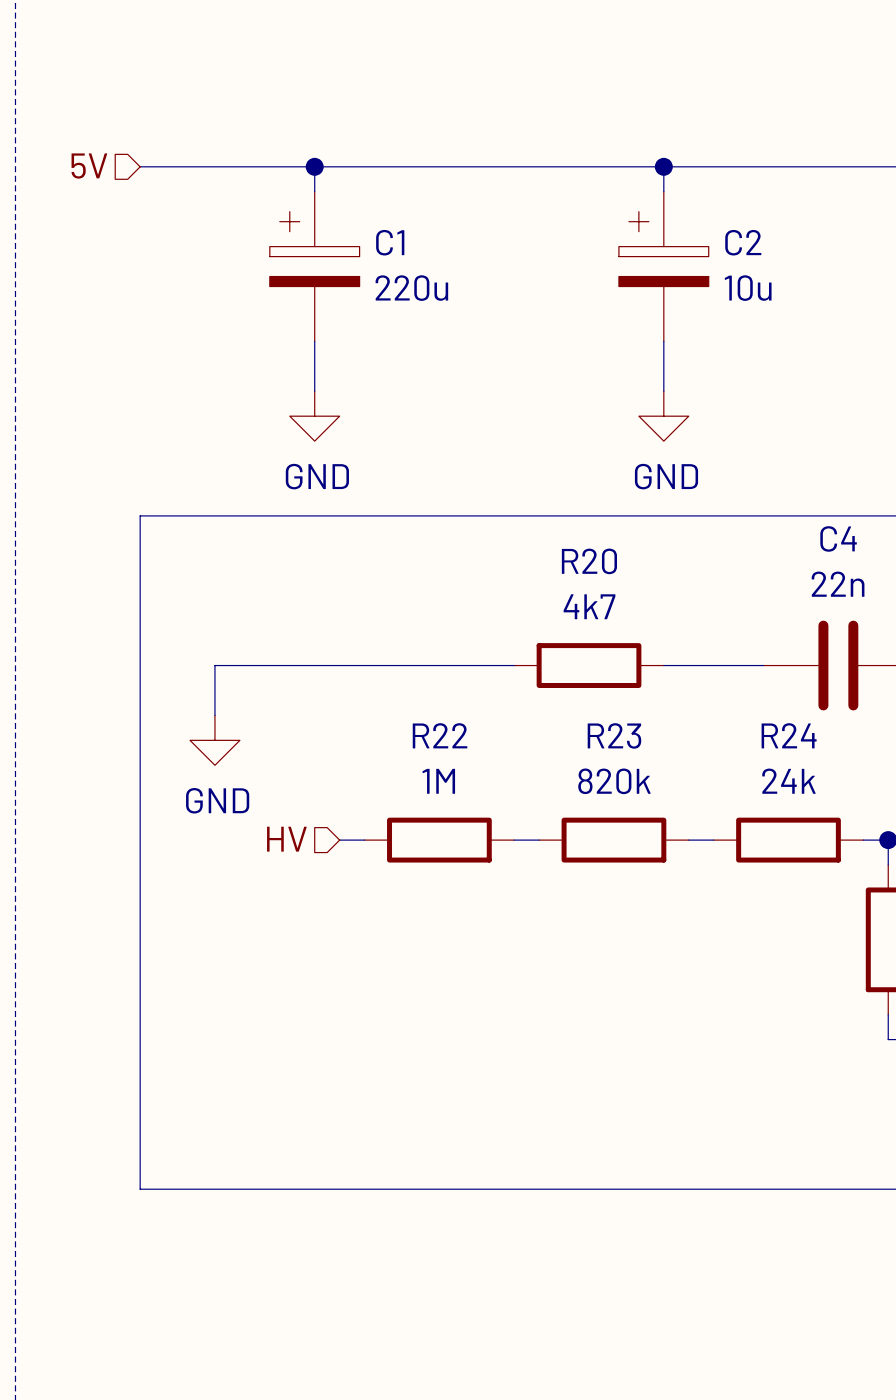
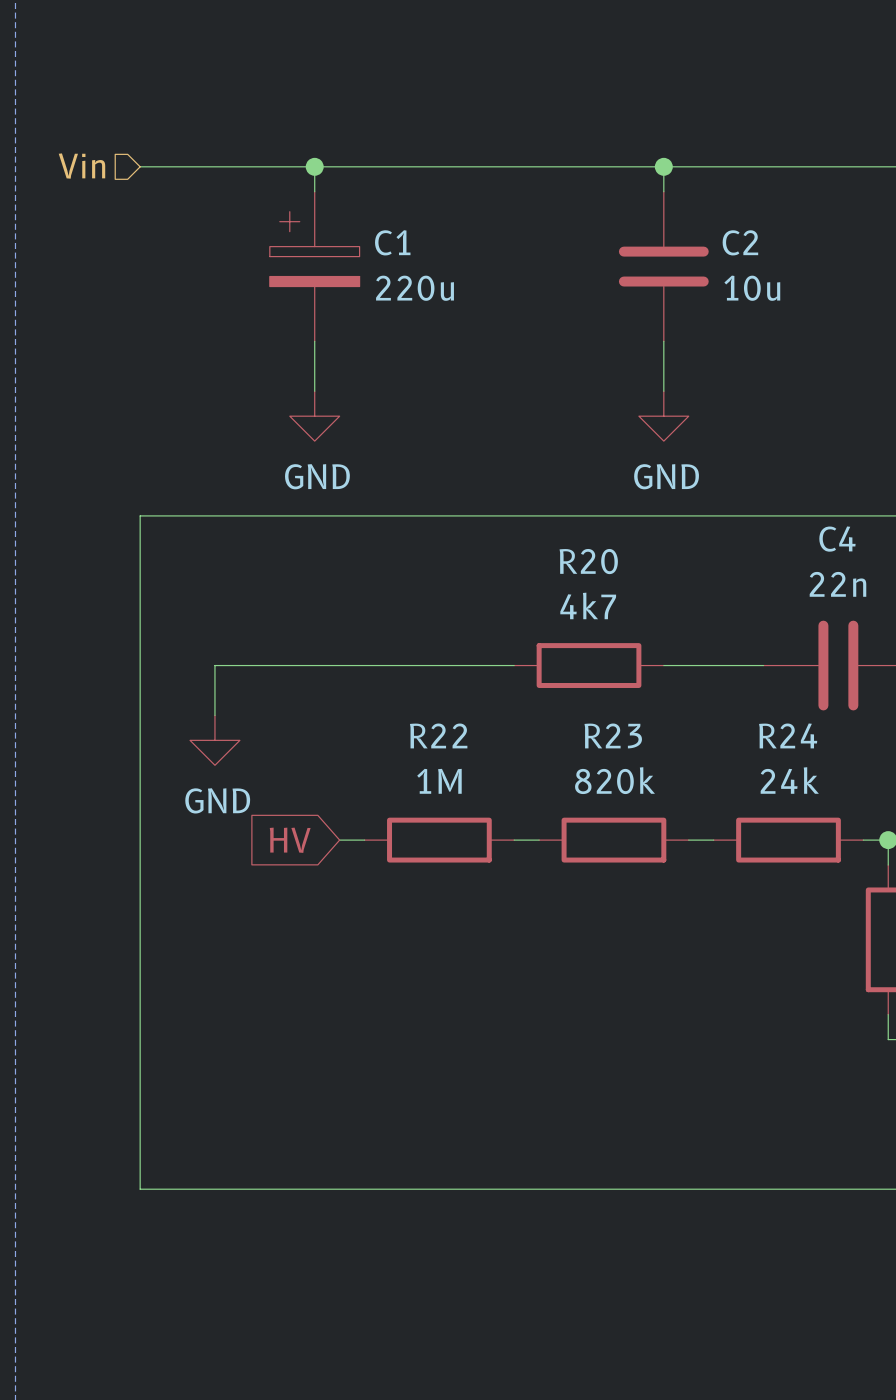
hierarchical label: 5V (89, 166) -> Vin (81, 166)
C2 symbol: [618, 191, 709, 342] -> [618, 191, 709, 342]
hierarchical label: HV (286, 839) -> none
global label: none -> HV (290, 840)

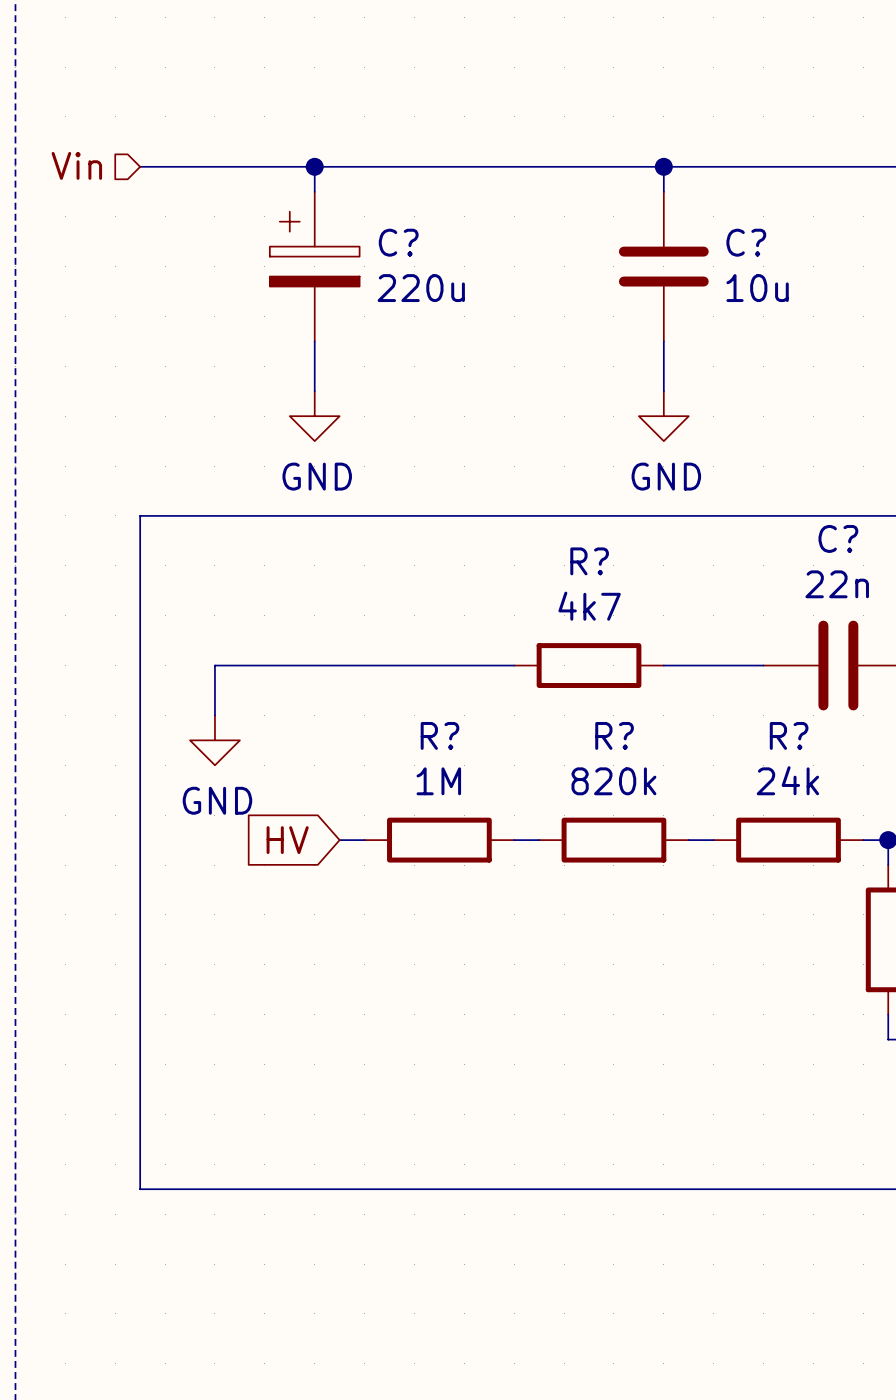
C1 name: C1 (392, 242) -> C? (398, 242)
C2 name: C2 (740, 242) -> C? (746, 242)
C4 name: C4 (837, 539) -> C? (838, 538)
R20 name: R20 (588, 561) -> R? (589, 561)
R22 name: R22 (438, 735) -> R? (439, 735)
R23 name: R23 (613, 735) -> R? (614, 735)
R24 name: R24 (788, 735) -> R? (789, 735)

